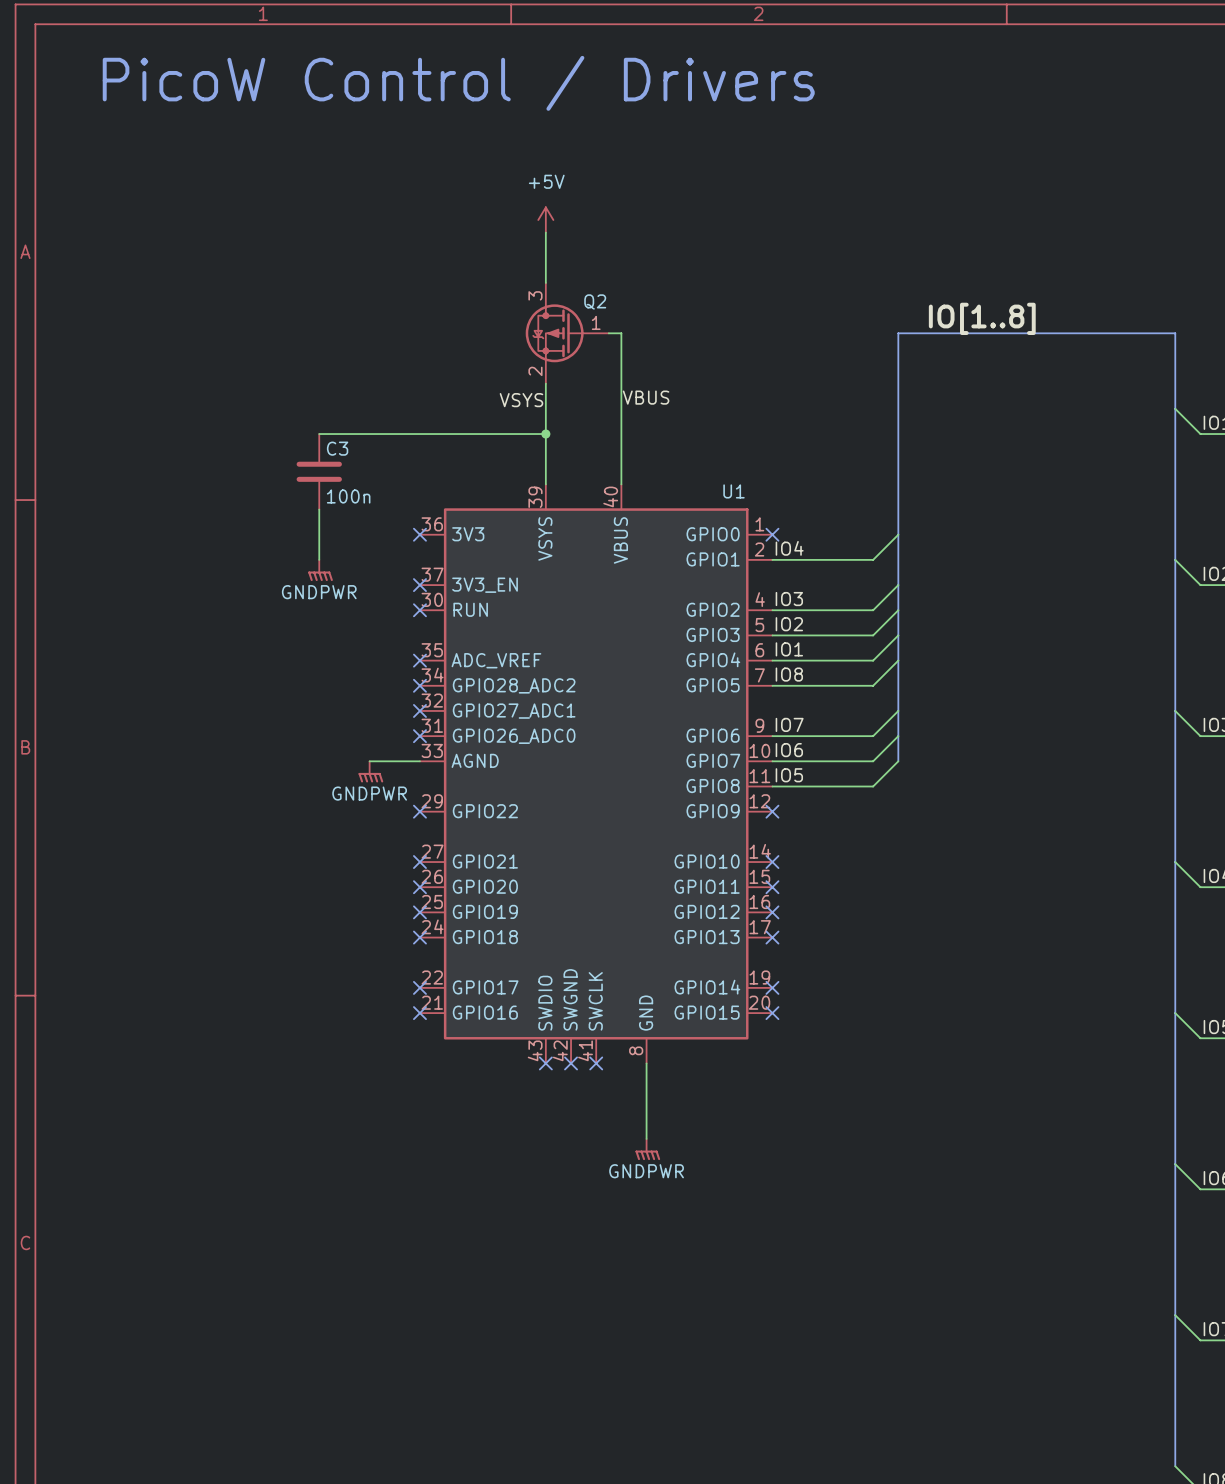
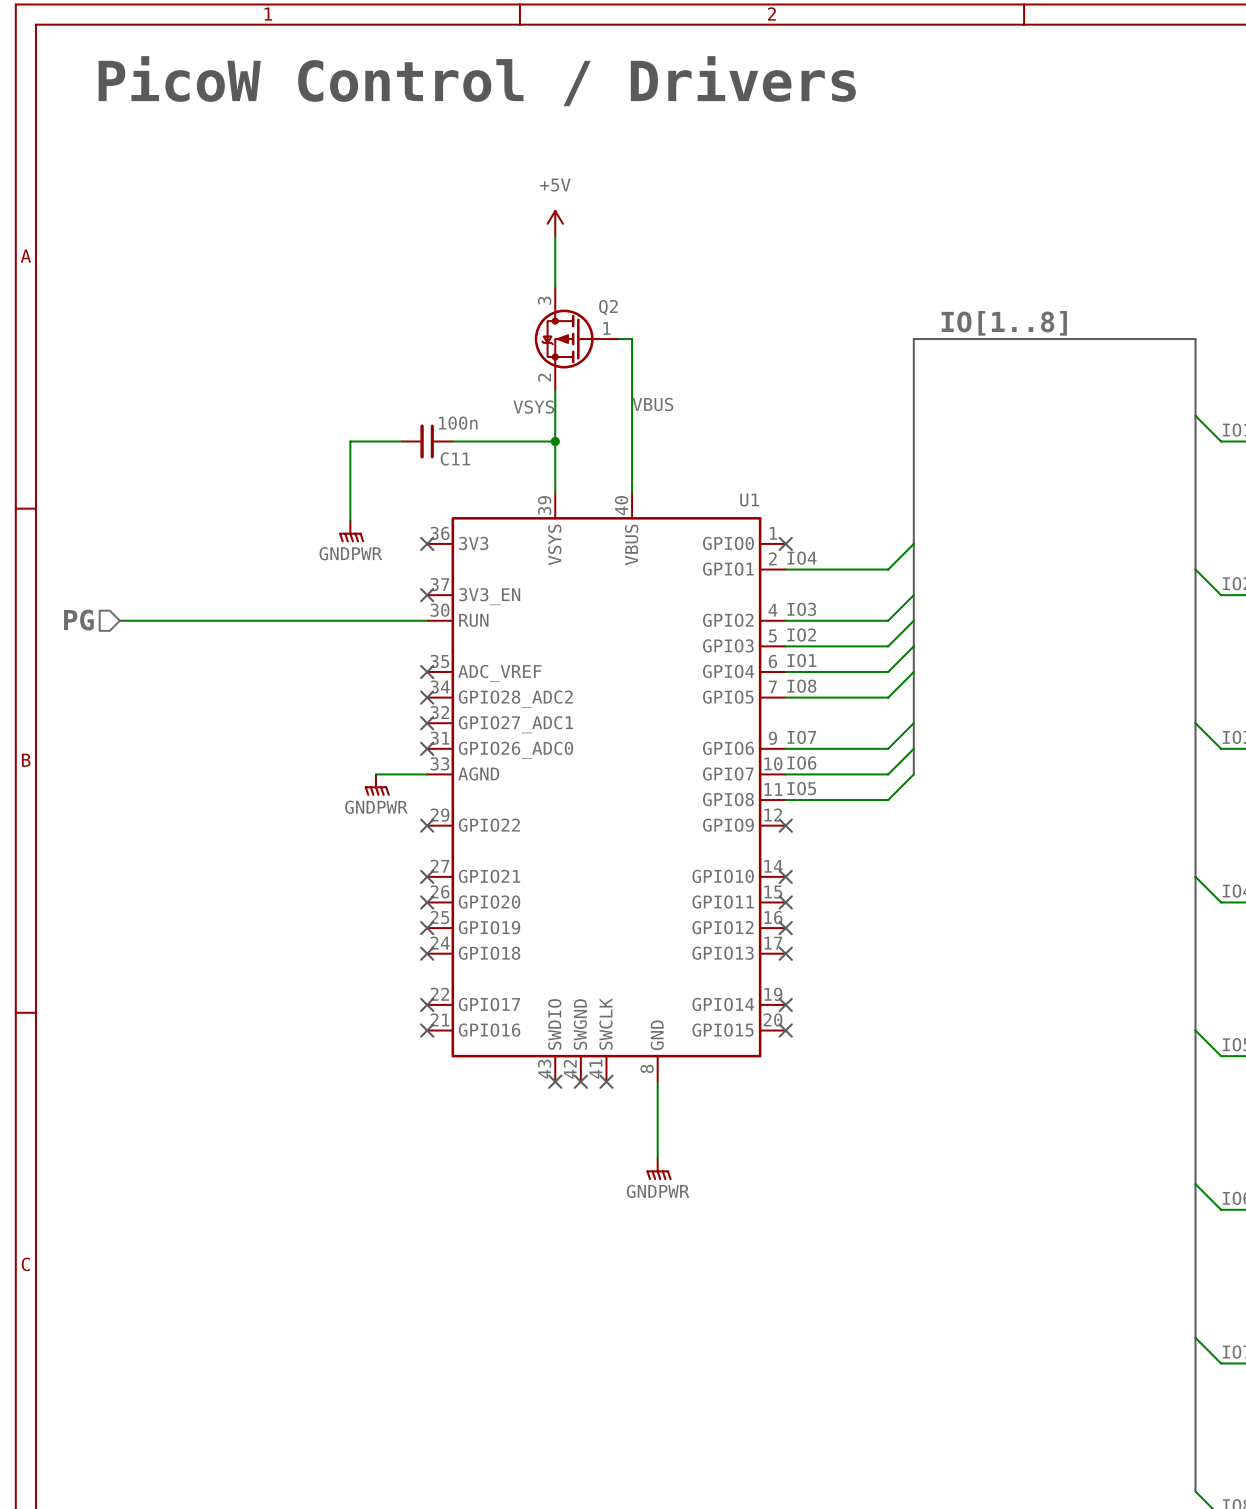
wire: (319, 434) (344, 434) -> (350, 520) (350, 441)
C11: none -> 100n (427, 441)
C3: 100n (319, 471) -> none
wire: (319, 509) (319, 559) -> none
power symbol position: GNDPWR (320, 570) -> GNDPWR (351, 531)
hierarchical label: none -> PG (78, 620)
wire: none -> (119, 620) (427, 620)
no-connect mark: (419, 610) -> none

